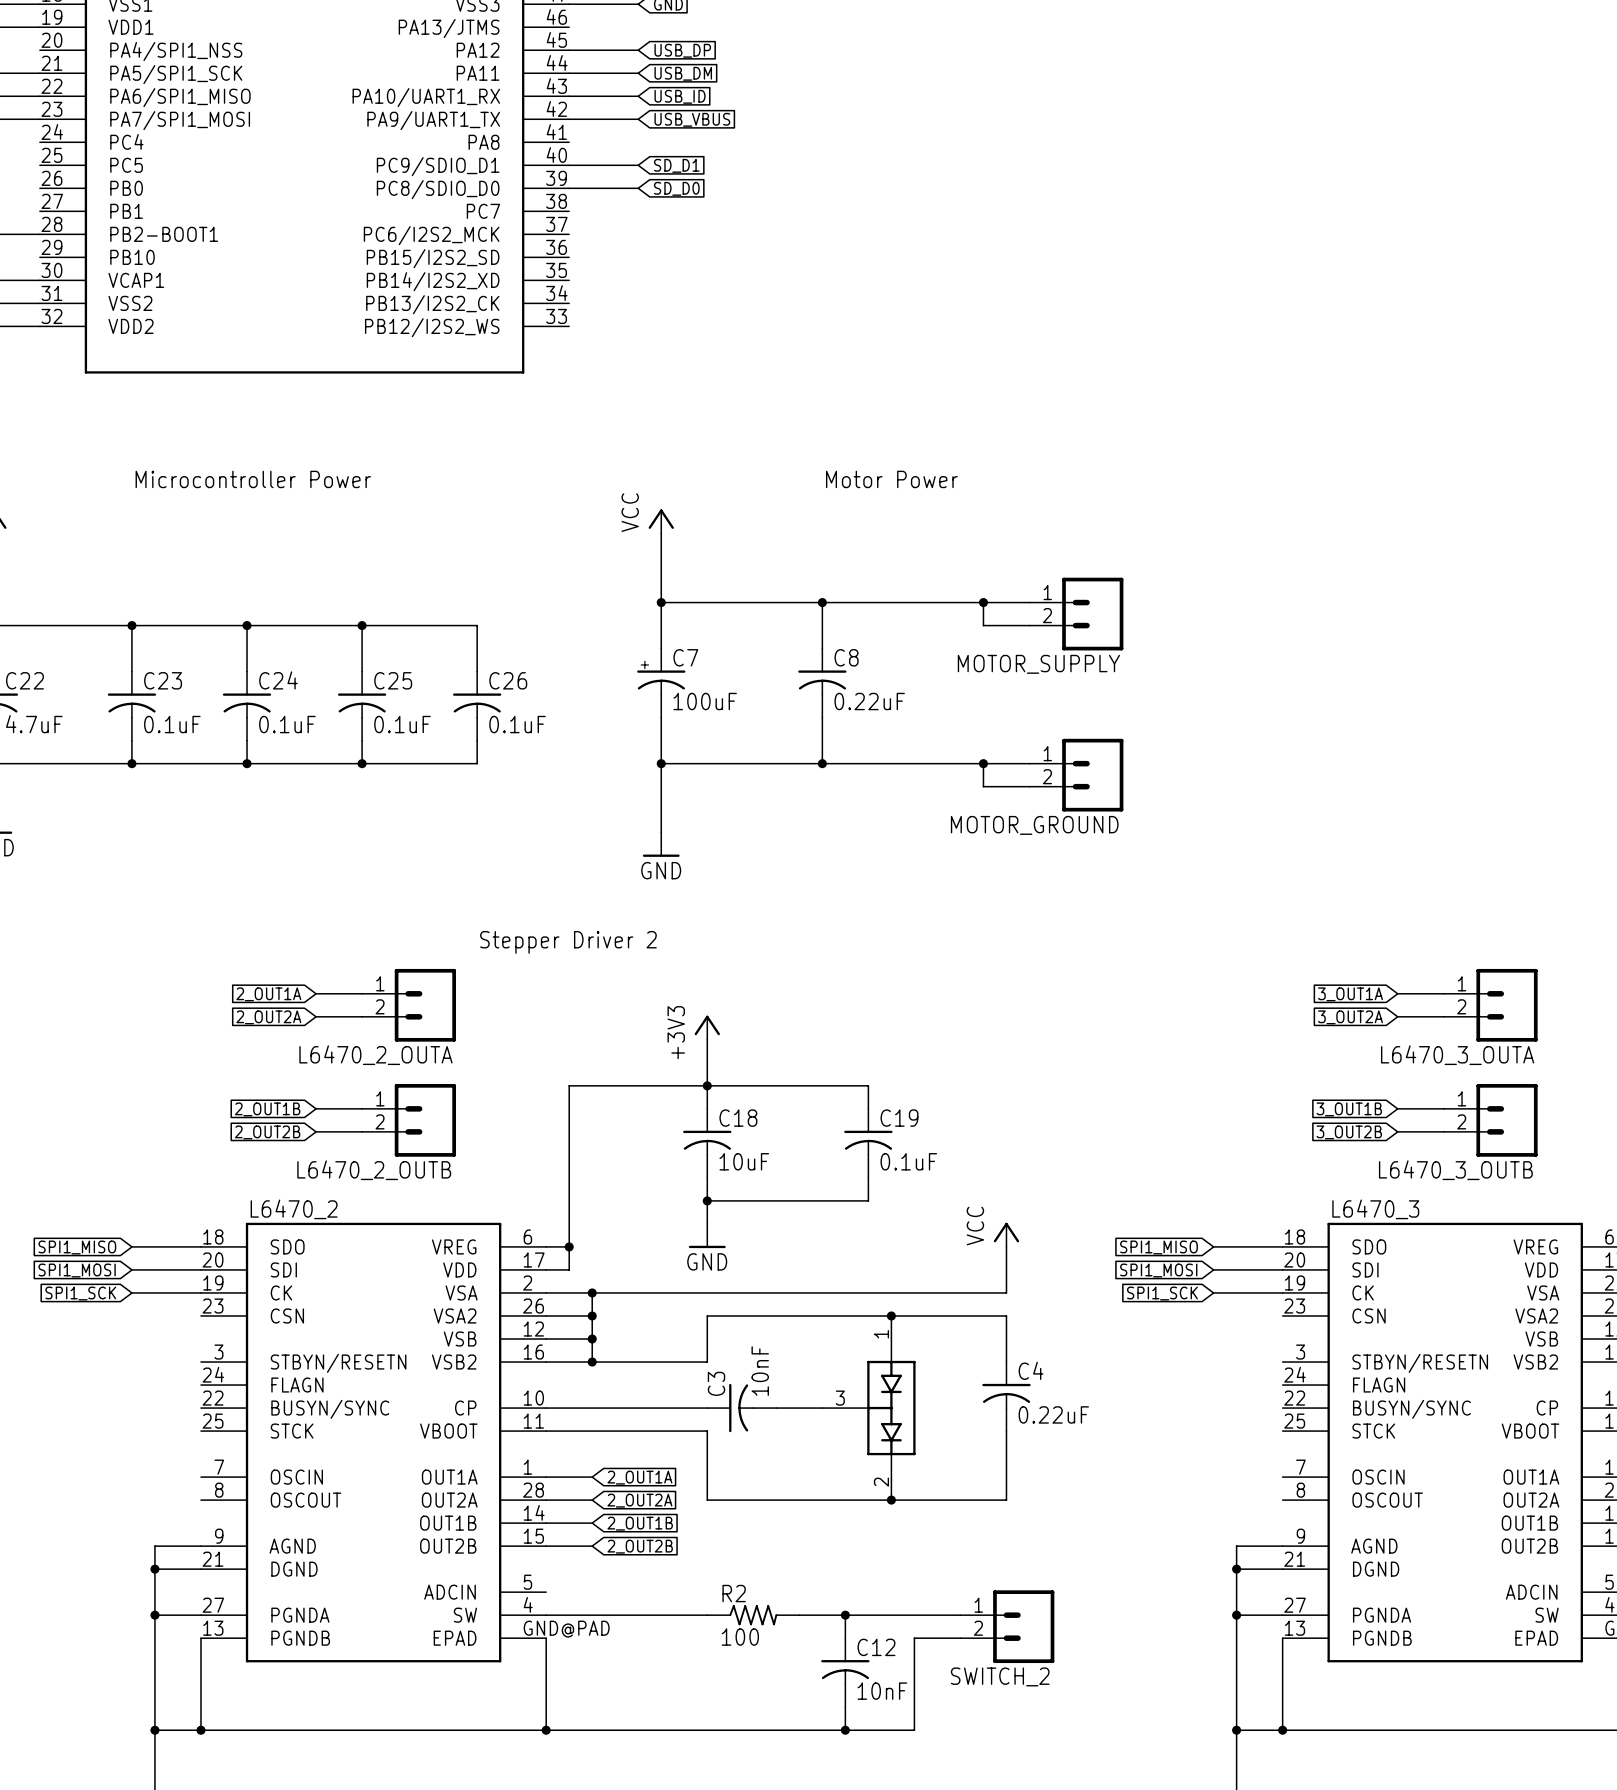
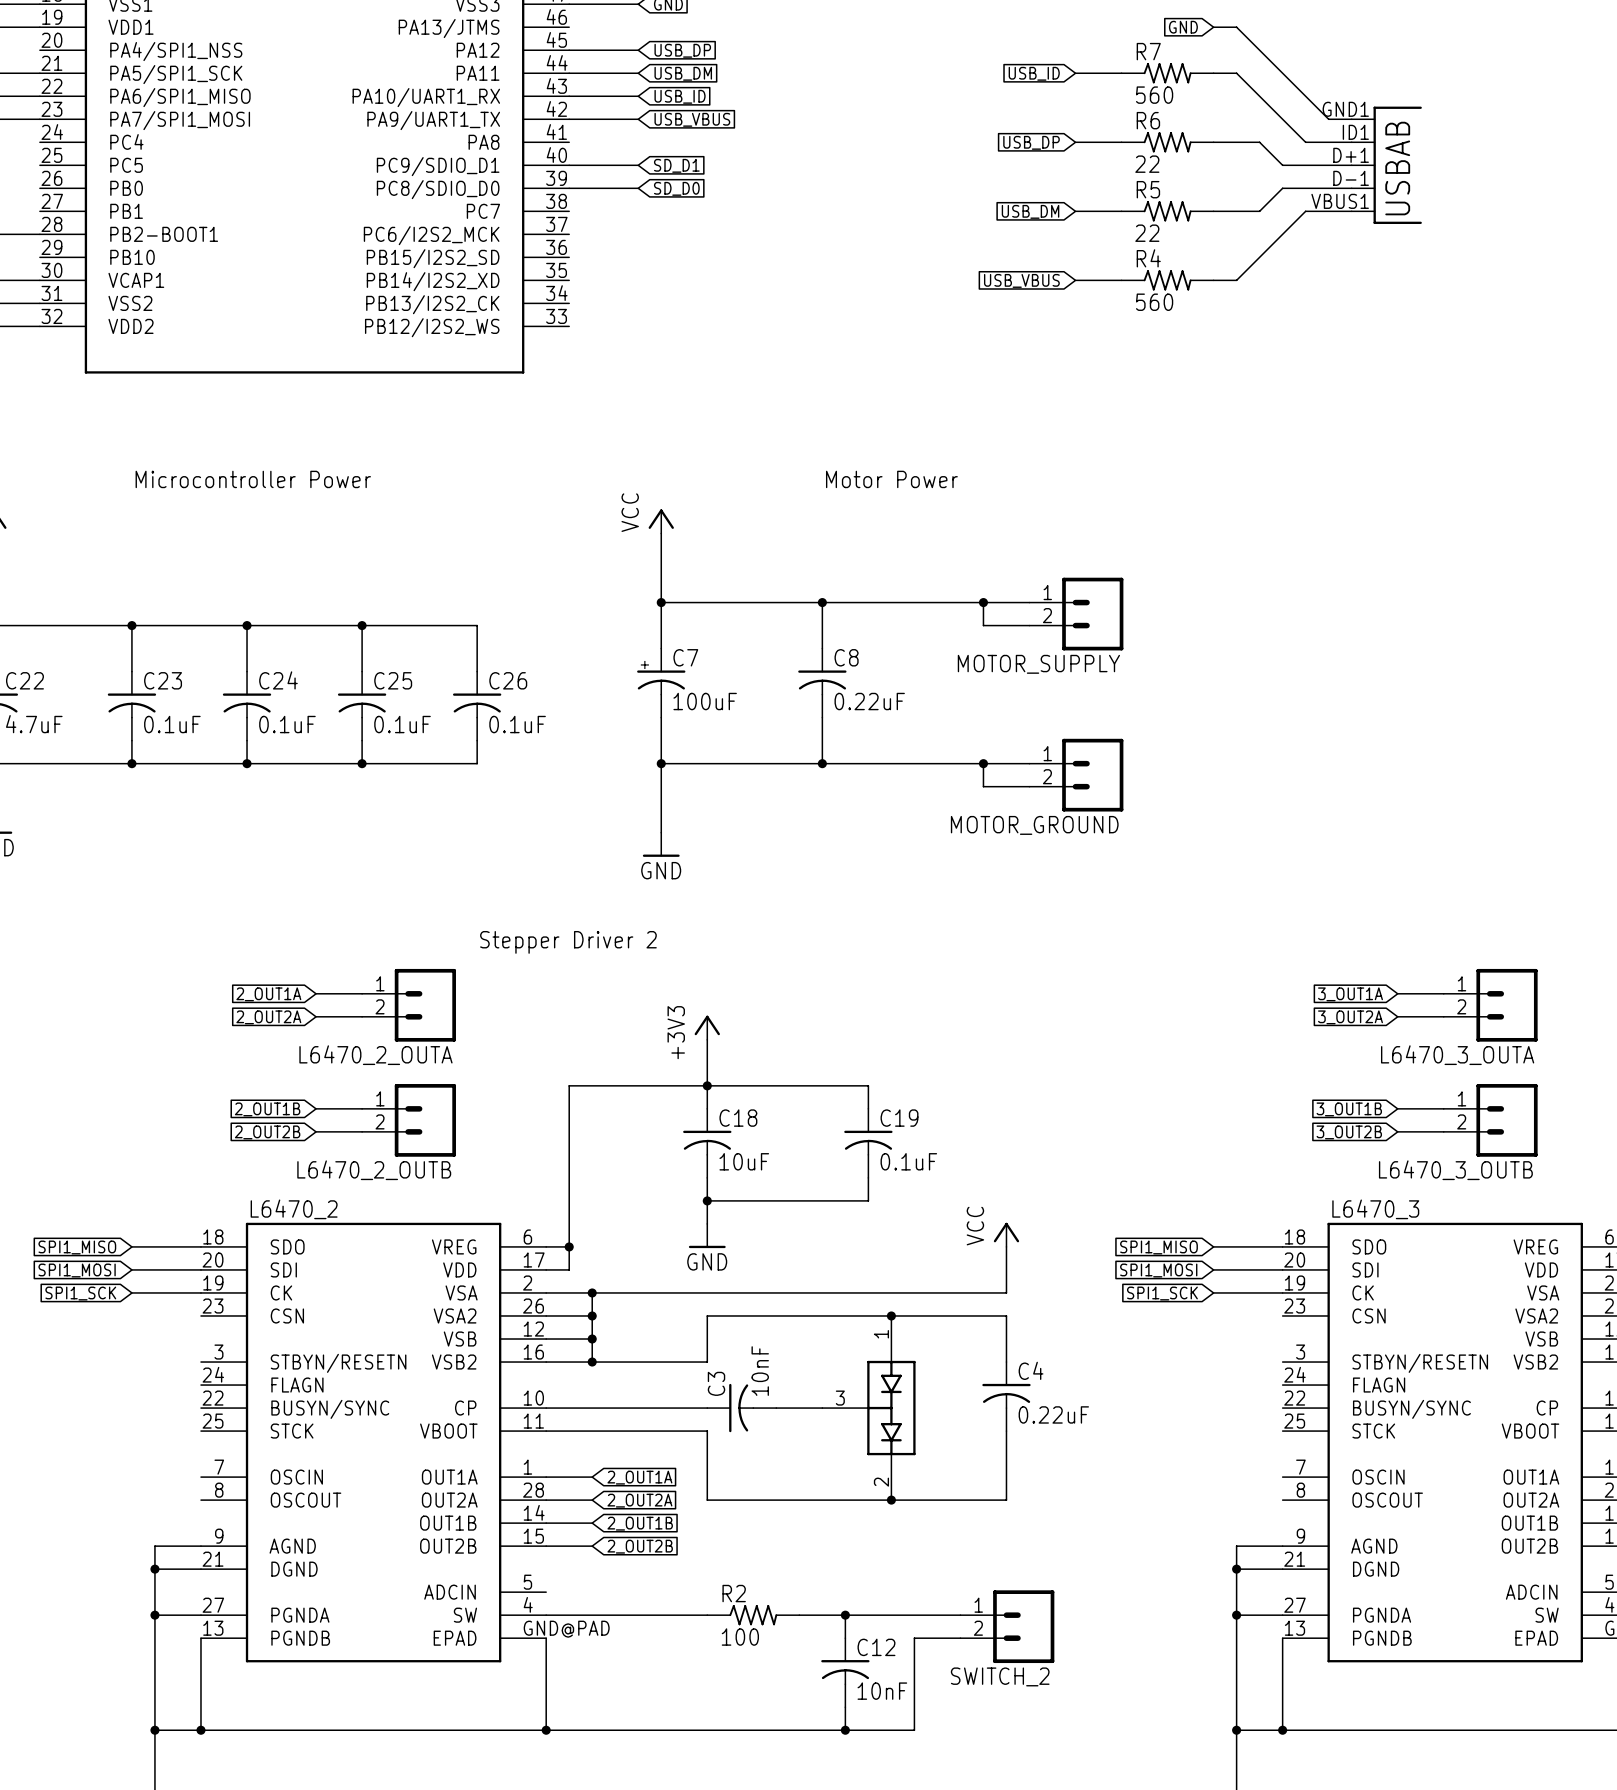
global label: none -> GND (1183, 27)
wire: none -> (1213, 27) (1236, 27) (1328, 119) (1351, 119)
global label: none -> USB_ID (1034, 73)
wire: none -> (1075, 73) (1121, 73)
R7: none -> 560 (1167, 73)
wire: none -> (1213, 73) (1236, 73) (1305, 142) (1351, 142)
global label: none -> USB_DP (1031, 142)
wire: none -> (1075, 142) (1121, 142)
R6: none -> 22 (1167, 142)
wire: none -> (1213, 142) (1259, 142) (1282, 165) (1351, 165)
part: none -> (1386, 165)
wire: none -> (1351, 188) (1282, 188) (1259, 211) (1213, 211)
global label: none -> USB_DM (1030, 211)
wire: none -> (1075, 211) (1121, 211)
R5: none -> 22 (1167, 211)
wire: none -> (1351, 211) (1305, 211) (1236, 280) (1213, 280)
global label: none -> USB_VBUS (1021, 280)
wire: none -> (1075, 280) (1121, 280)
R4: none -> 560 (1167, 280)

